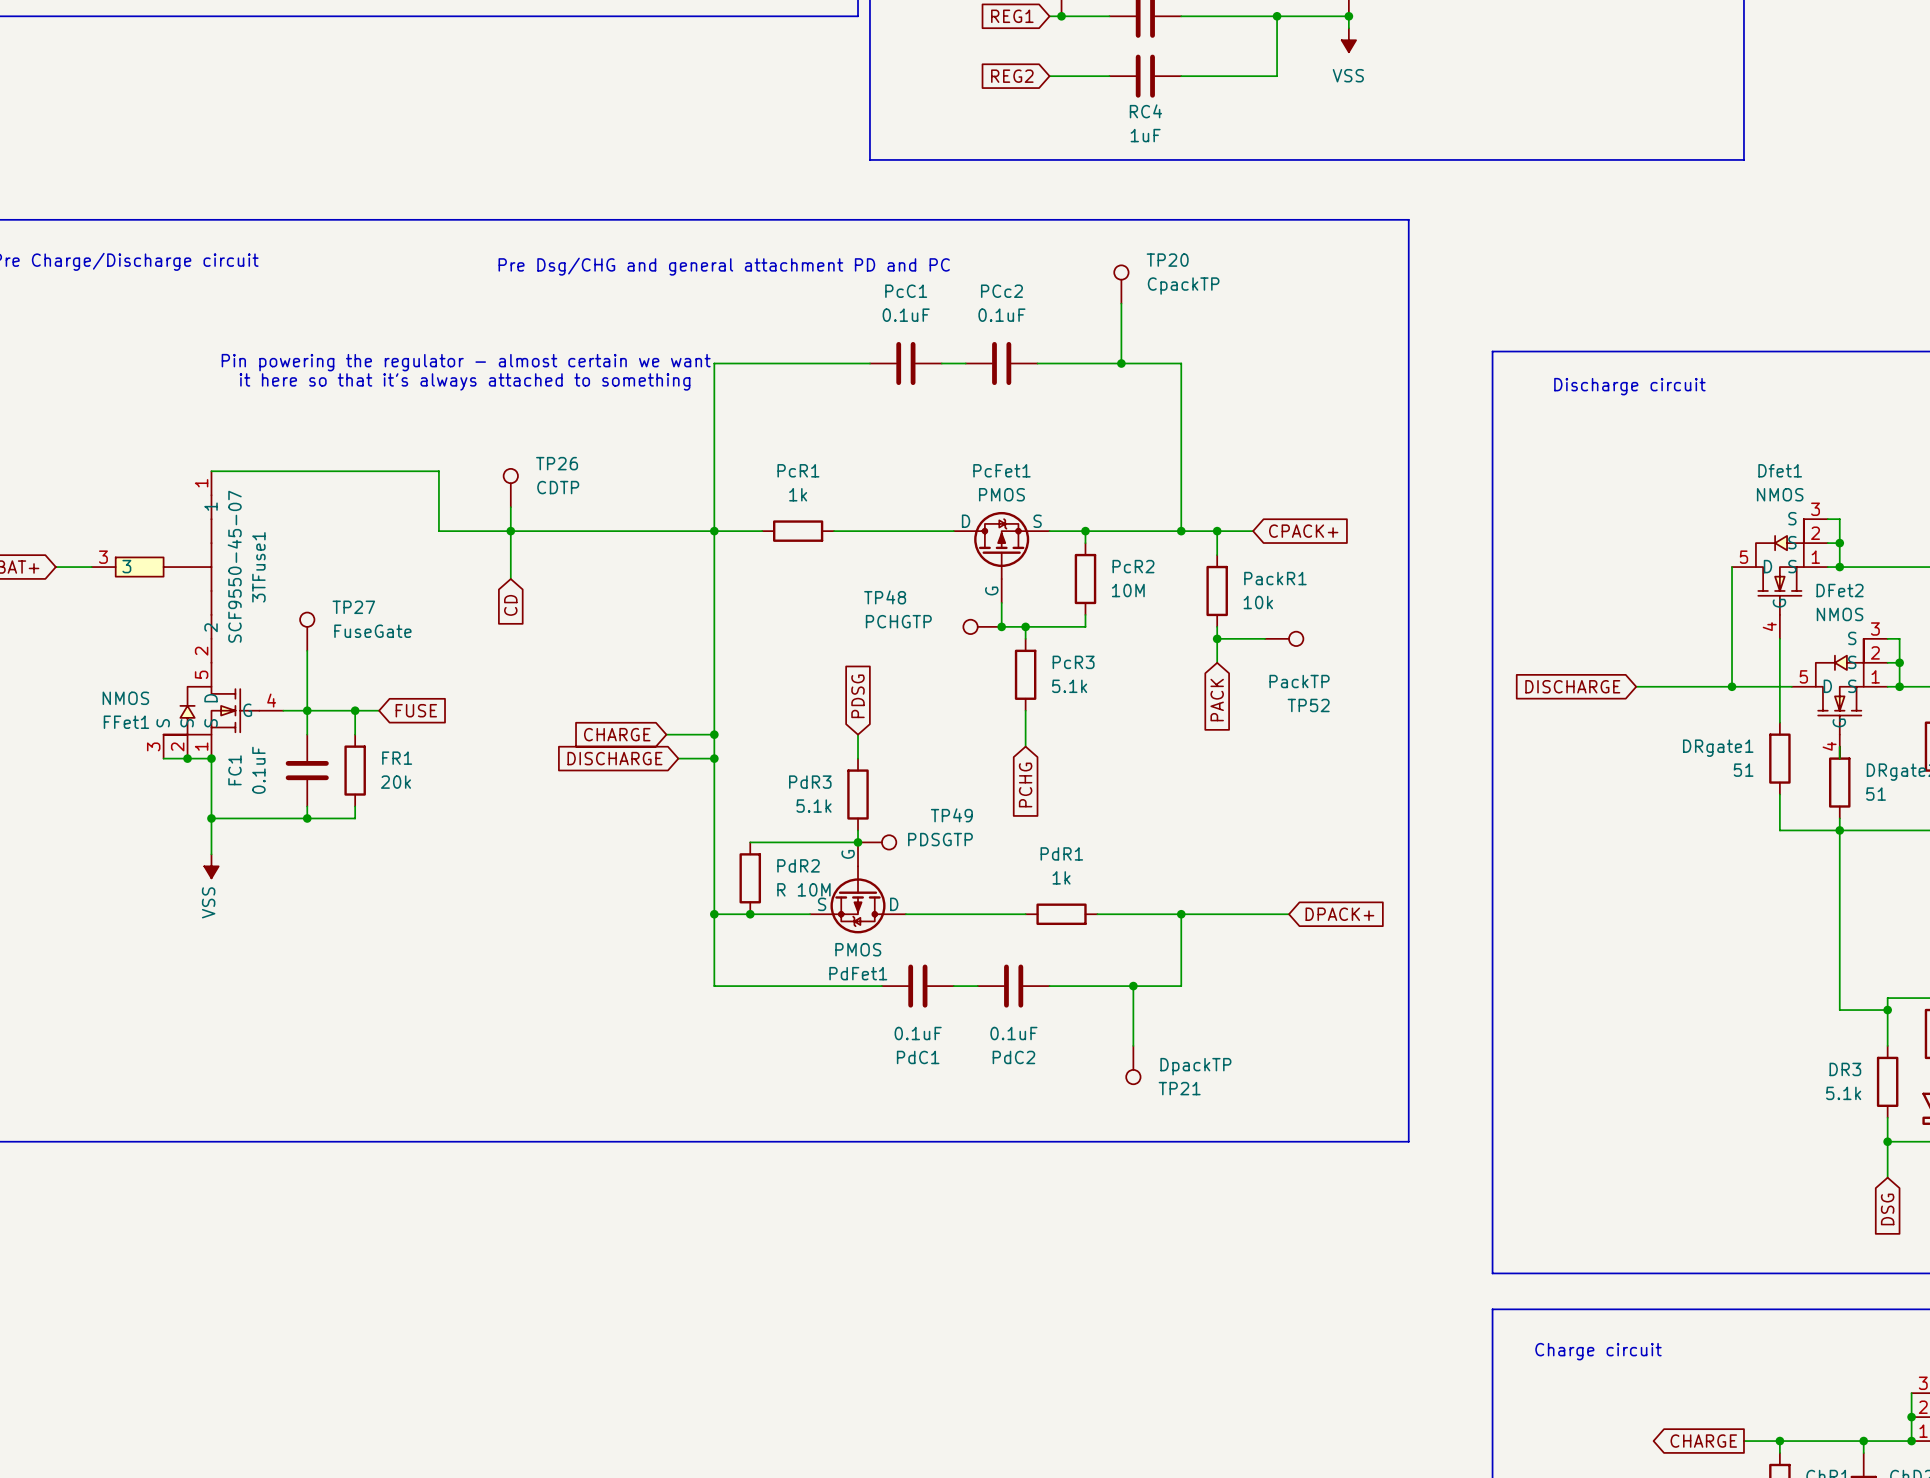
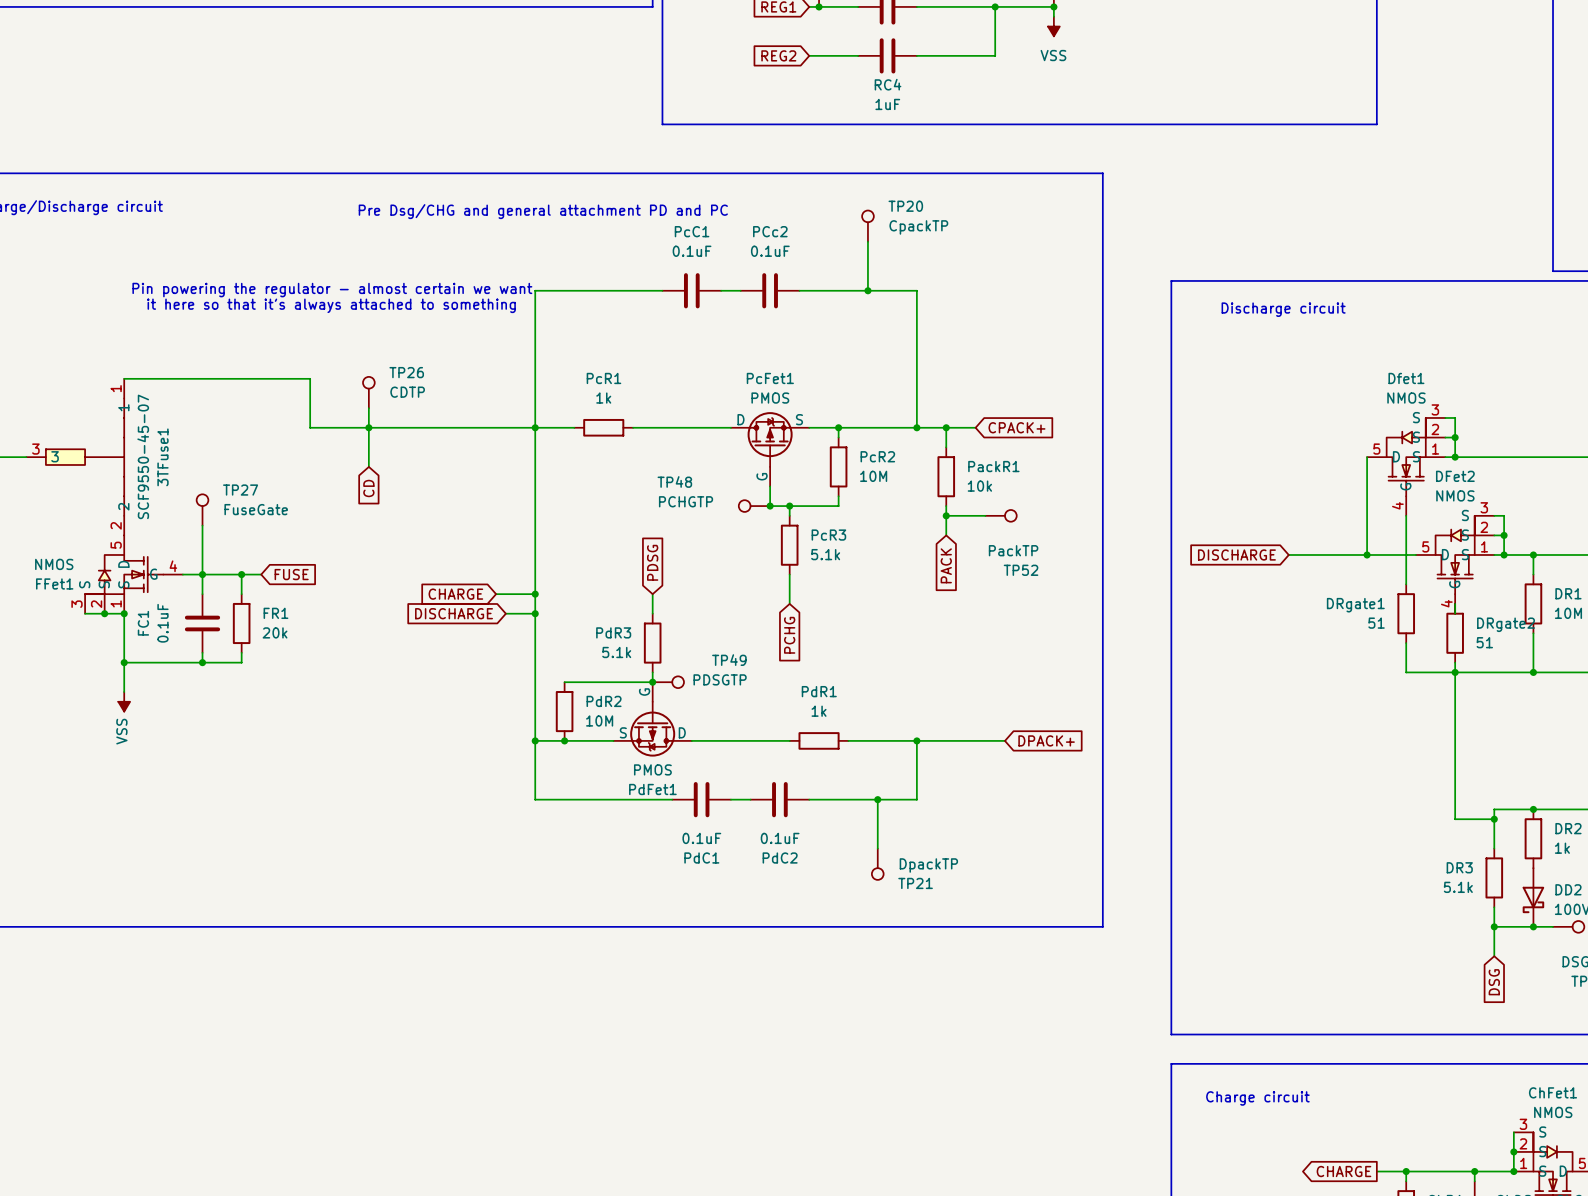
PdR2 value: R 10M (803, 889) -> 10M (599, 720)

